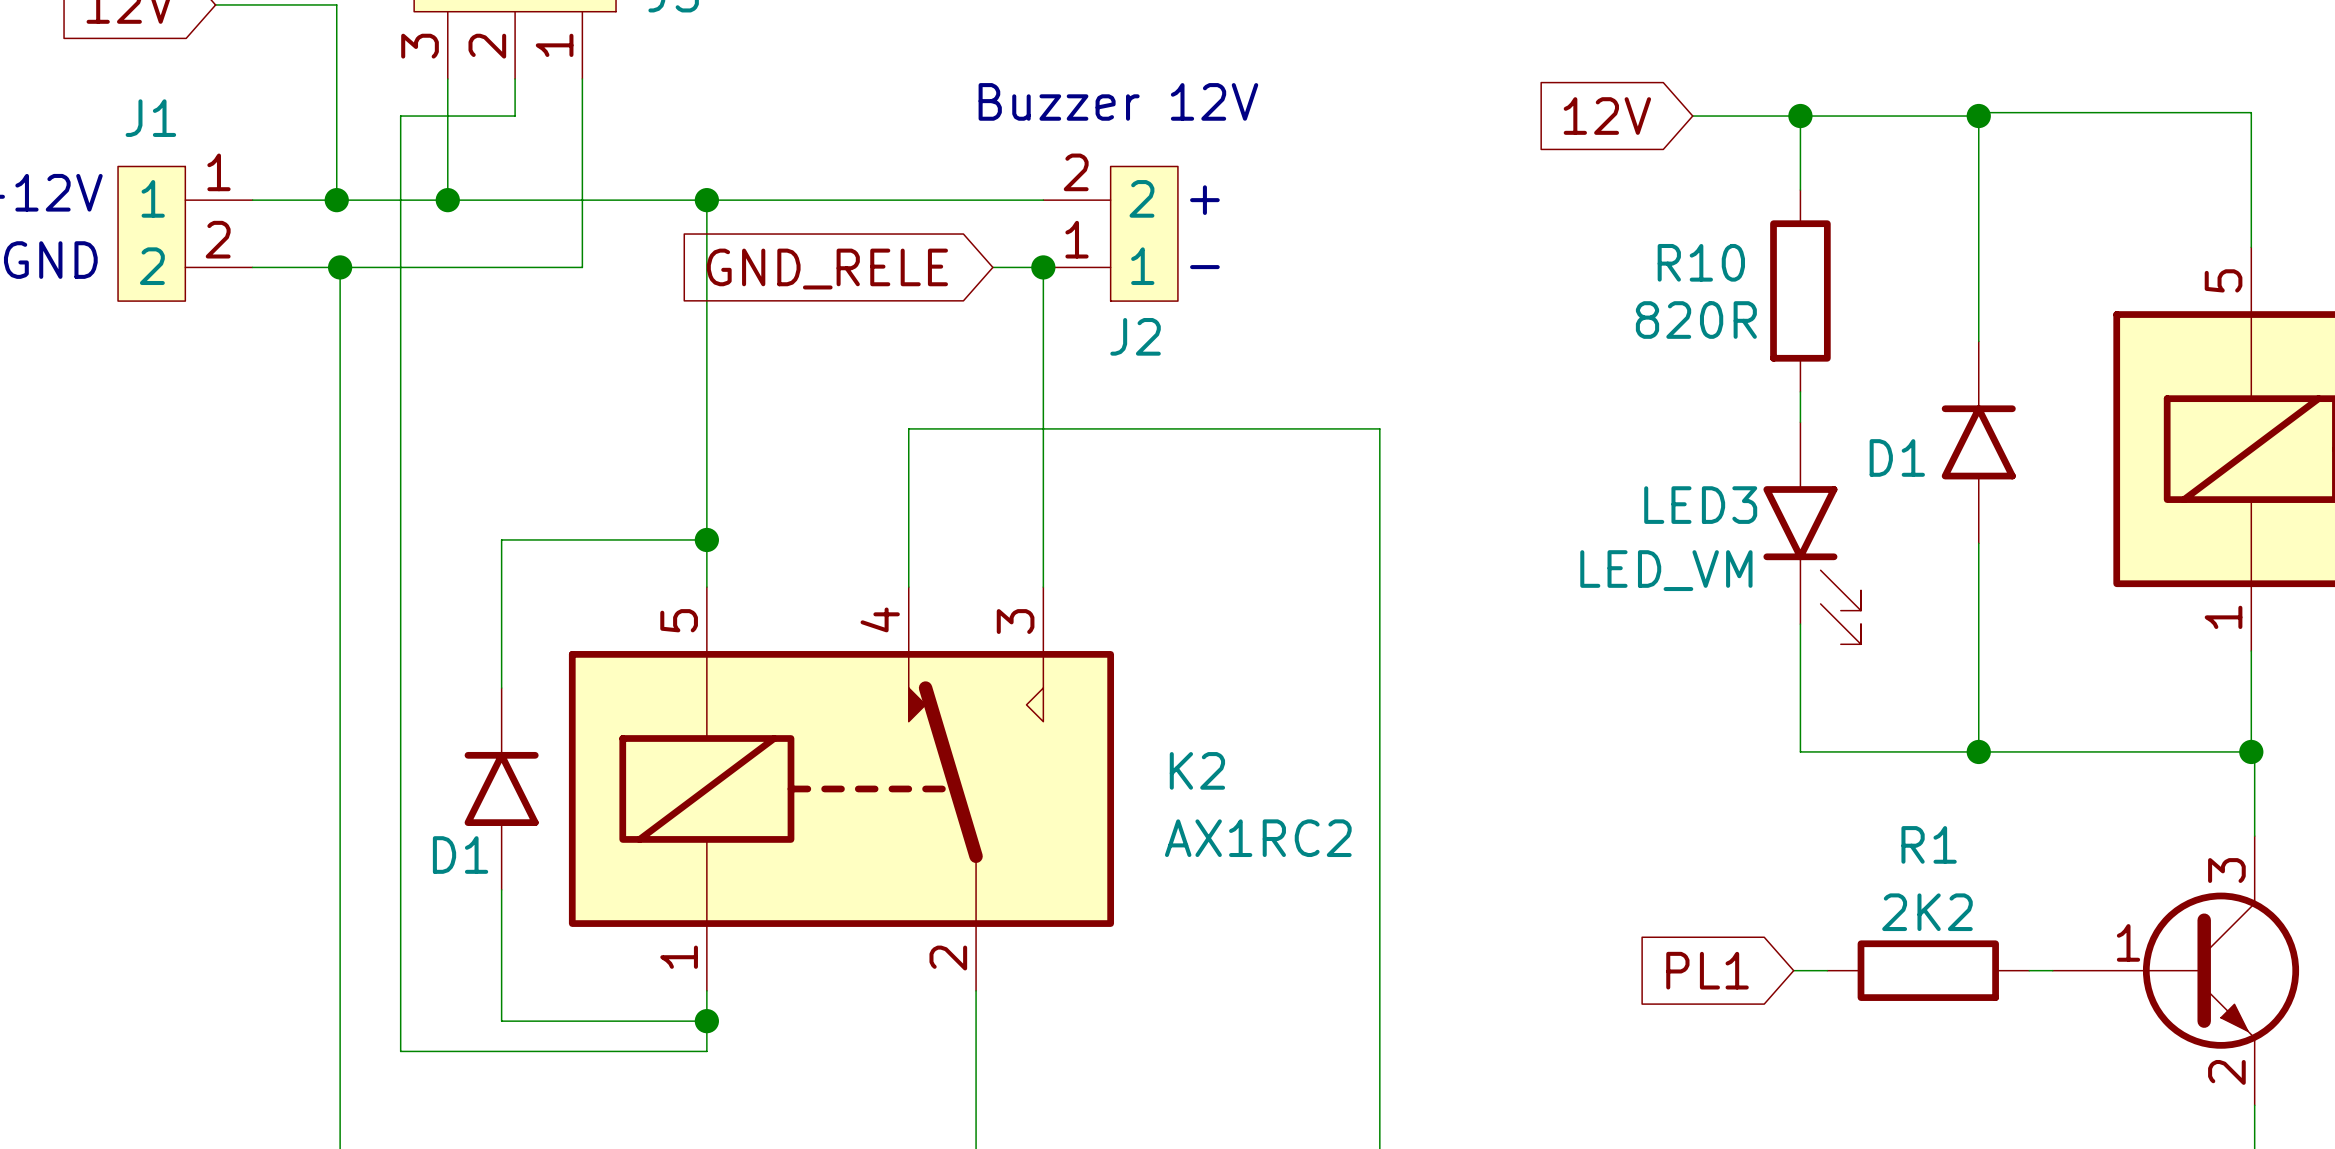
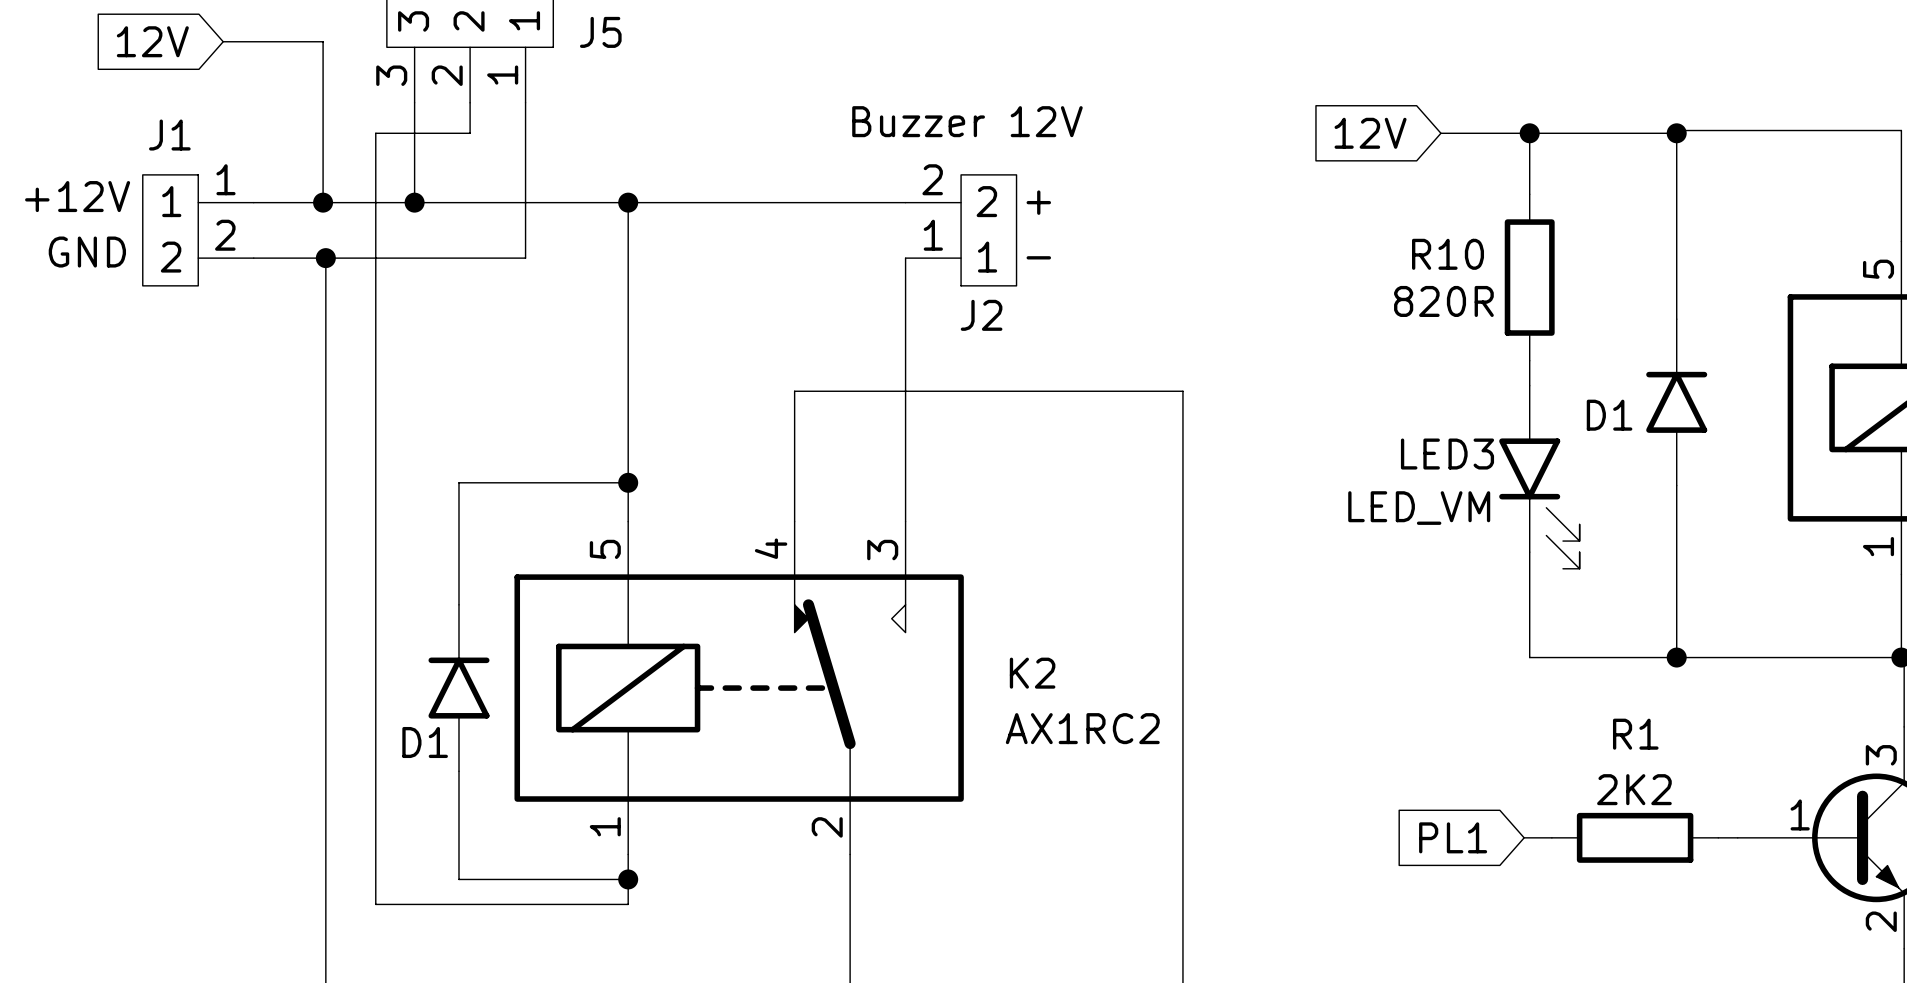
wire: (992, 267) (1043, 267) -> none
junction: (1043, 267) -> none
global label: GND_RELE (827, 269) -> none

